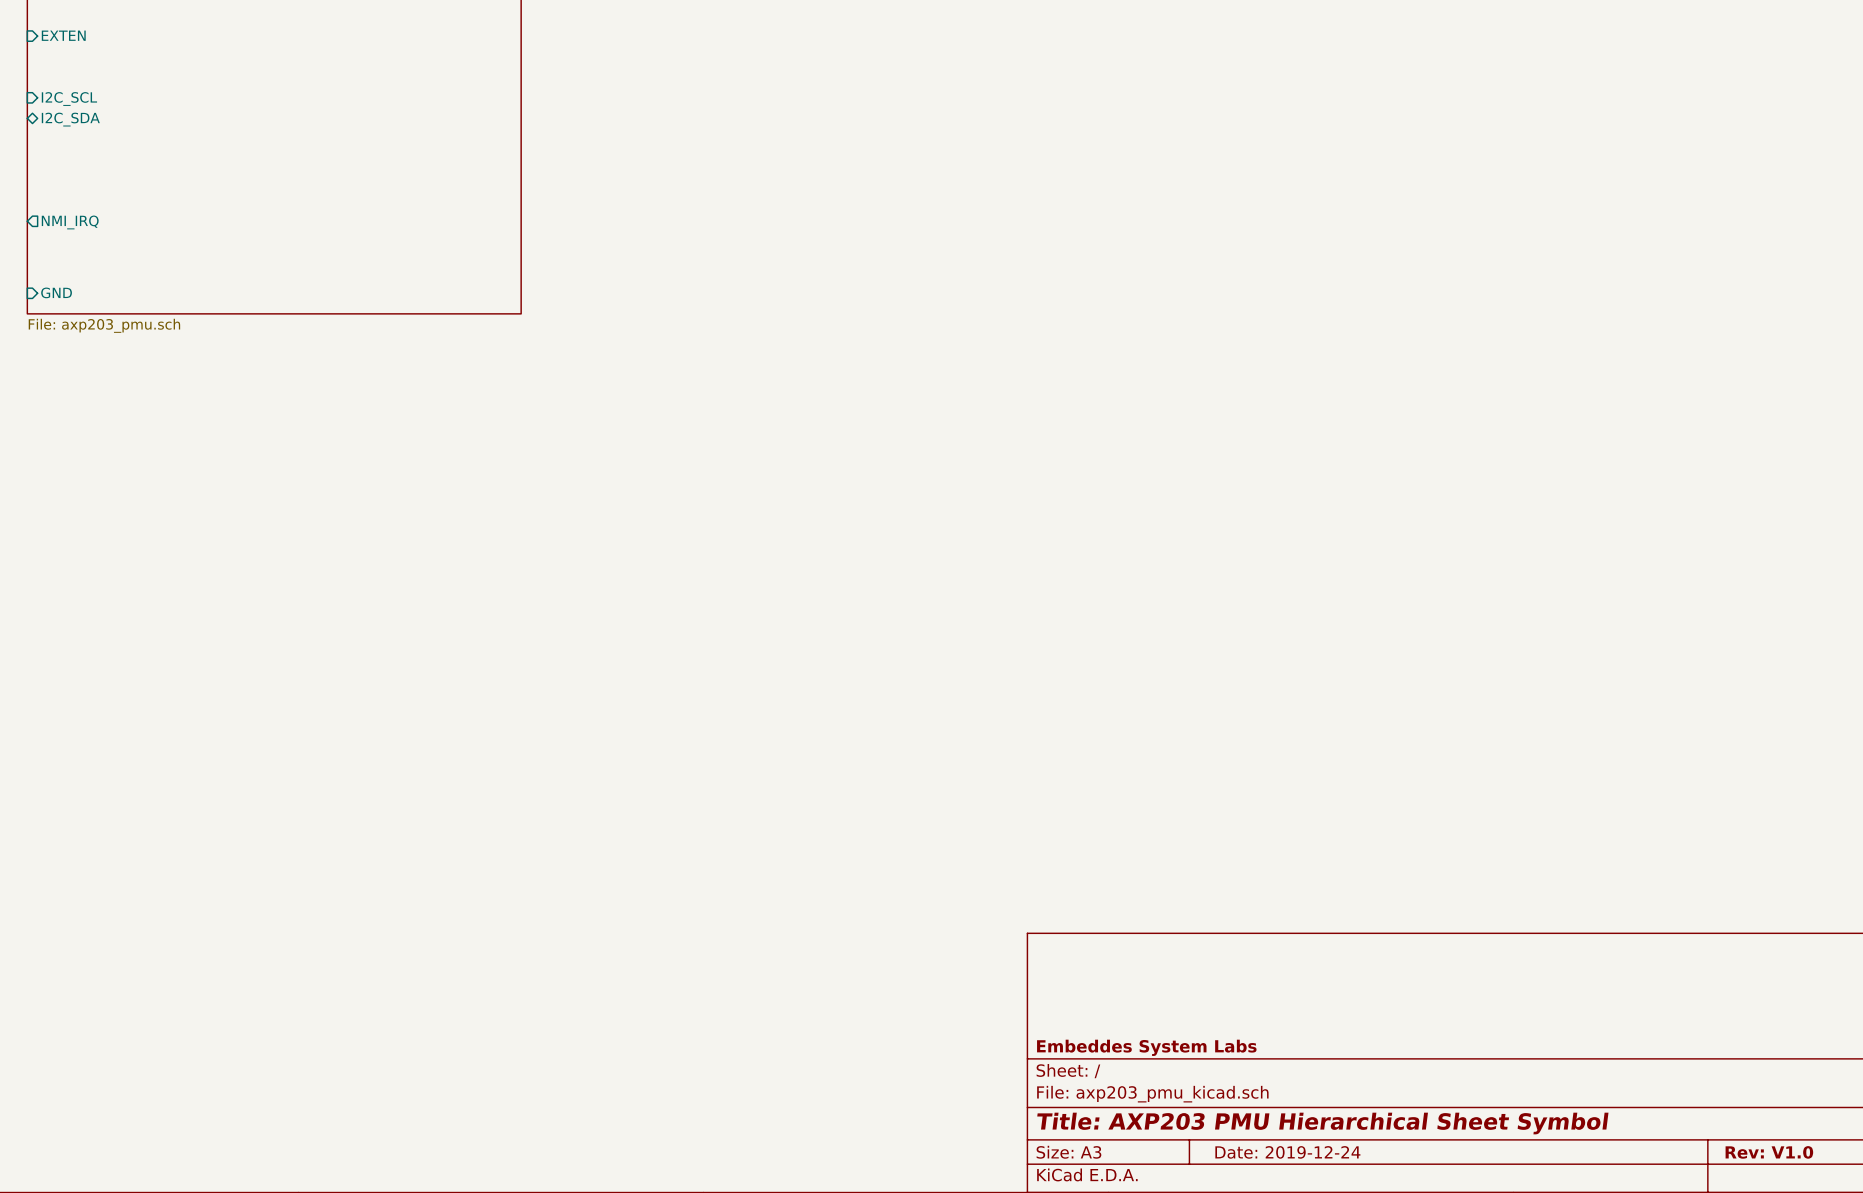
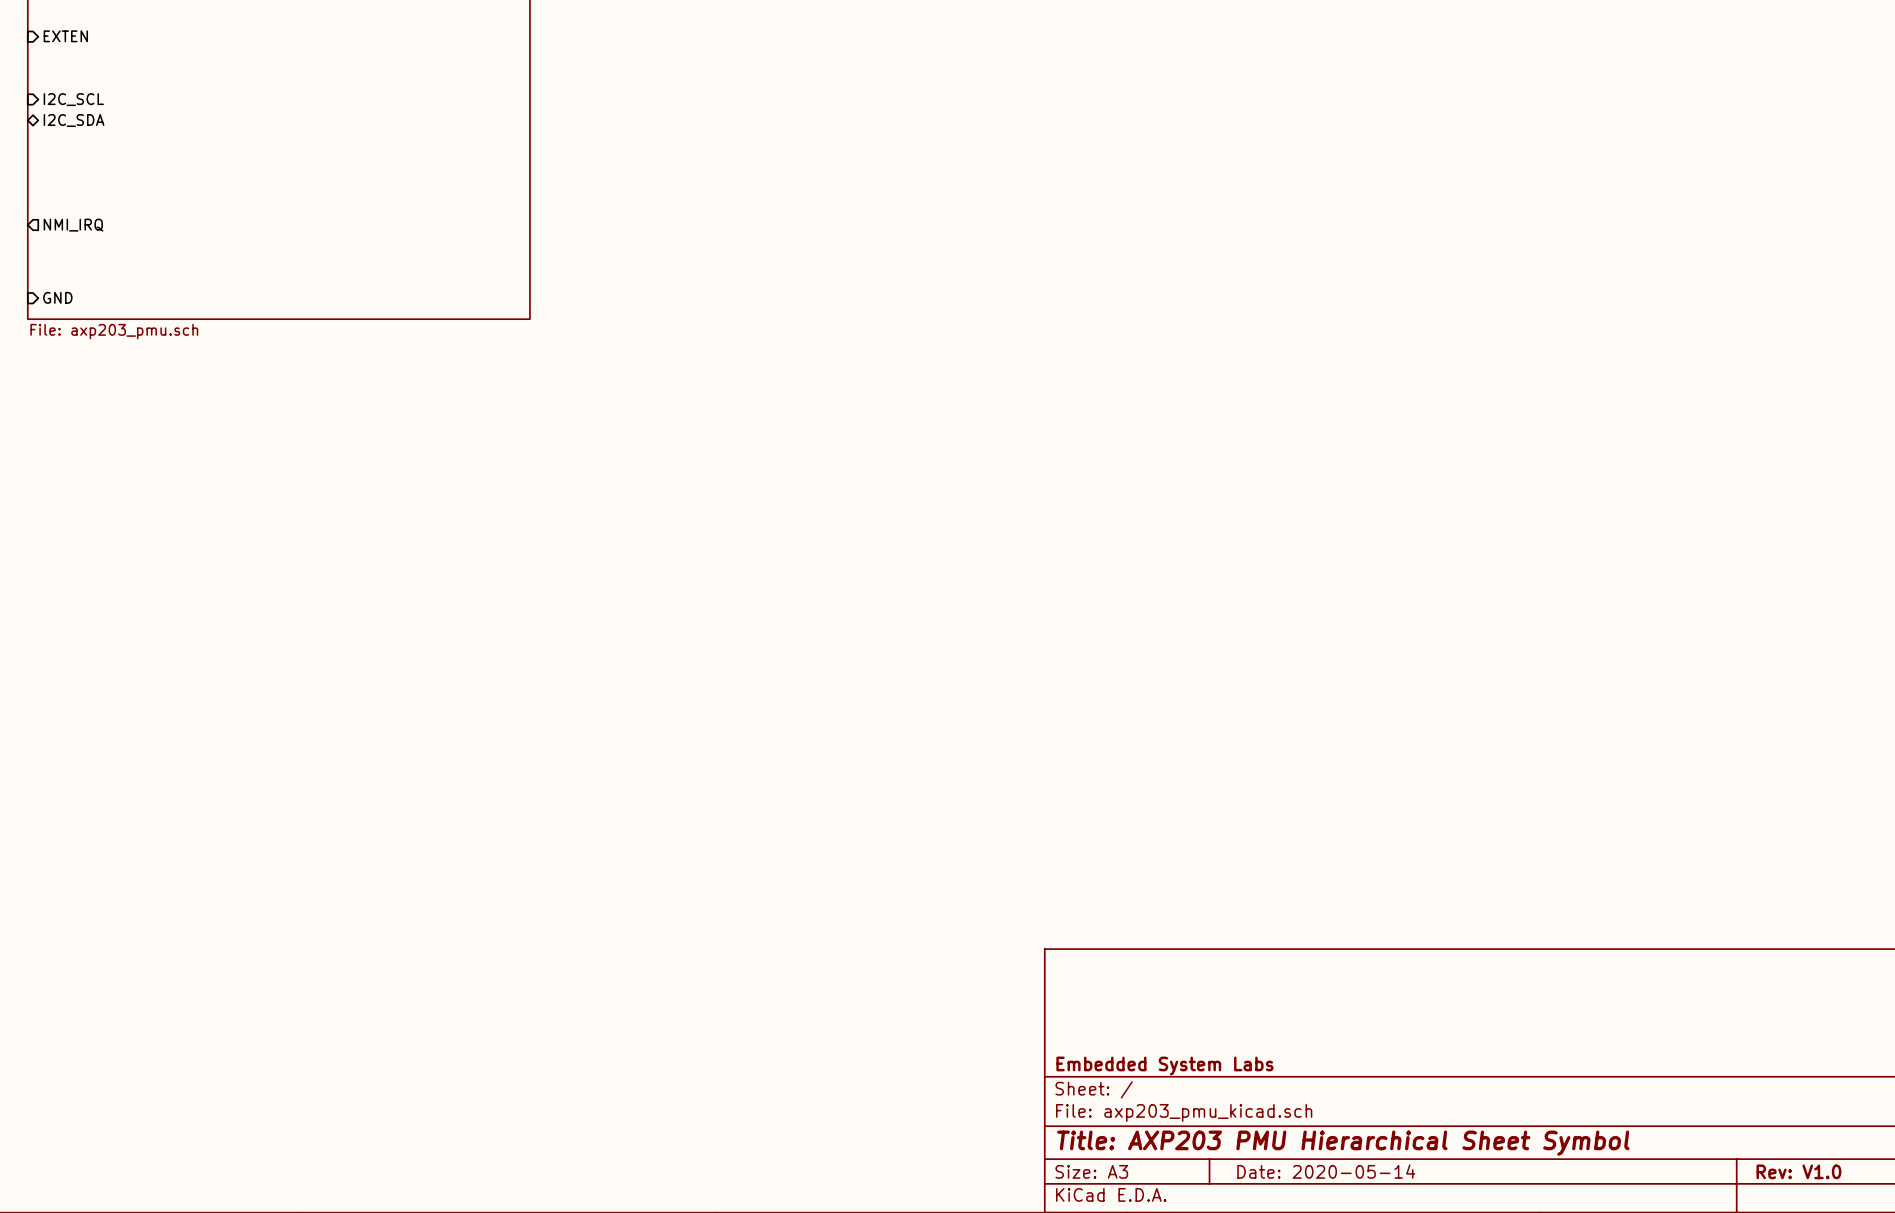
title block: Embeddes System Labs (1146, 1047) -> Embedded System Labs (1164, 1066)
title block: Date: 2019-12-24 (1287, 1152) -> Date: 2020-05-14 (1326, 1171)

